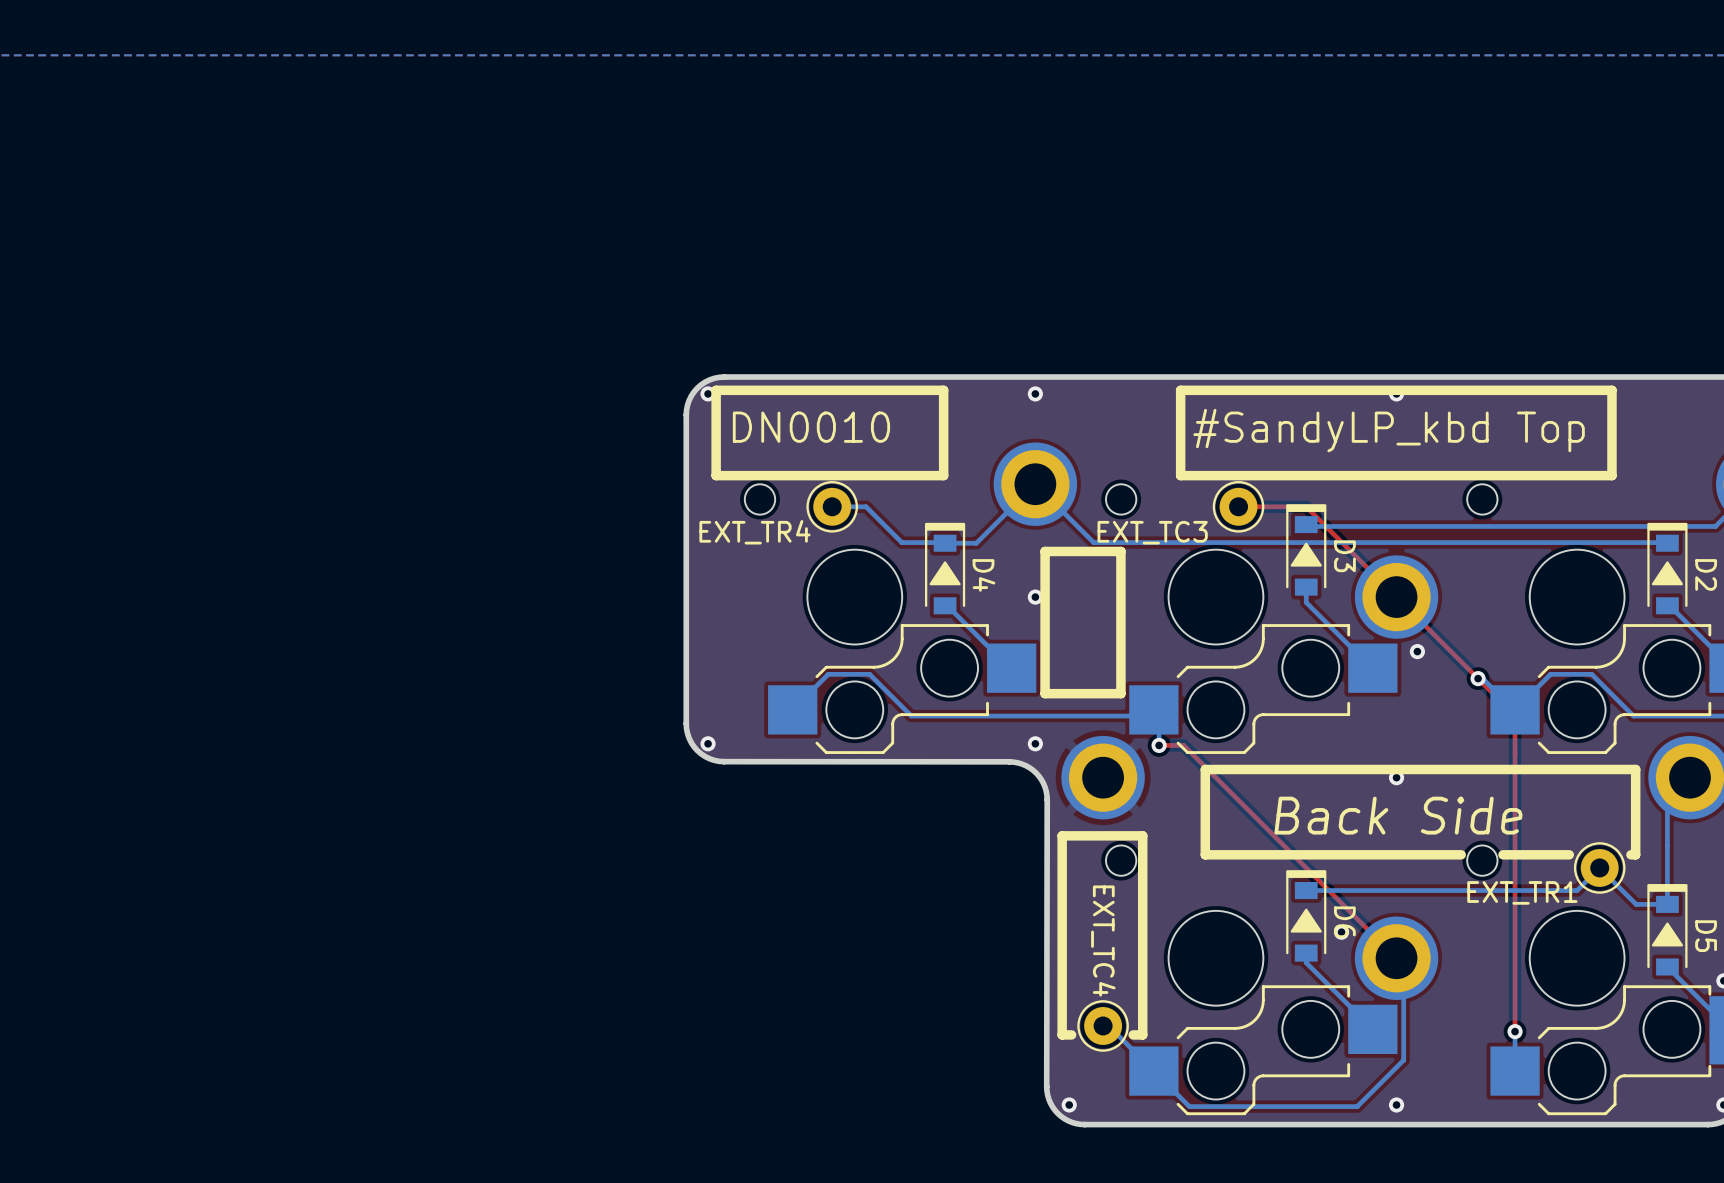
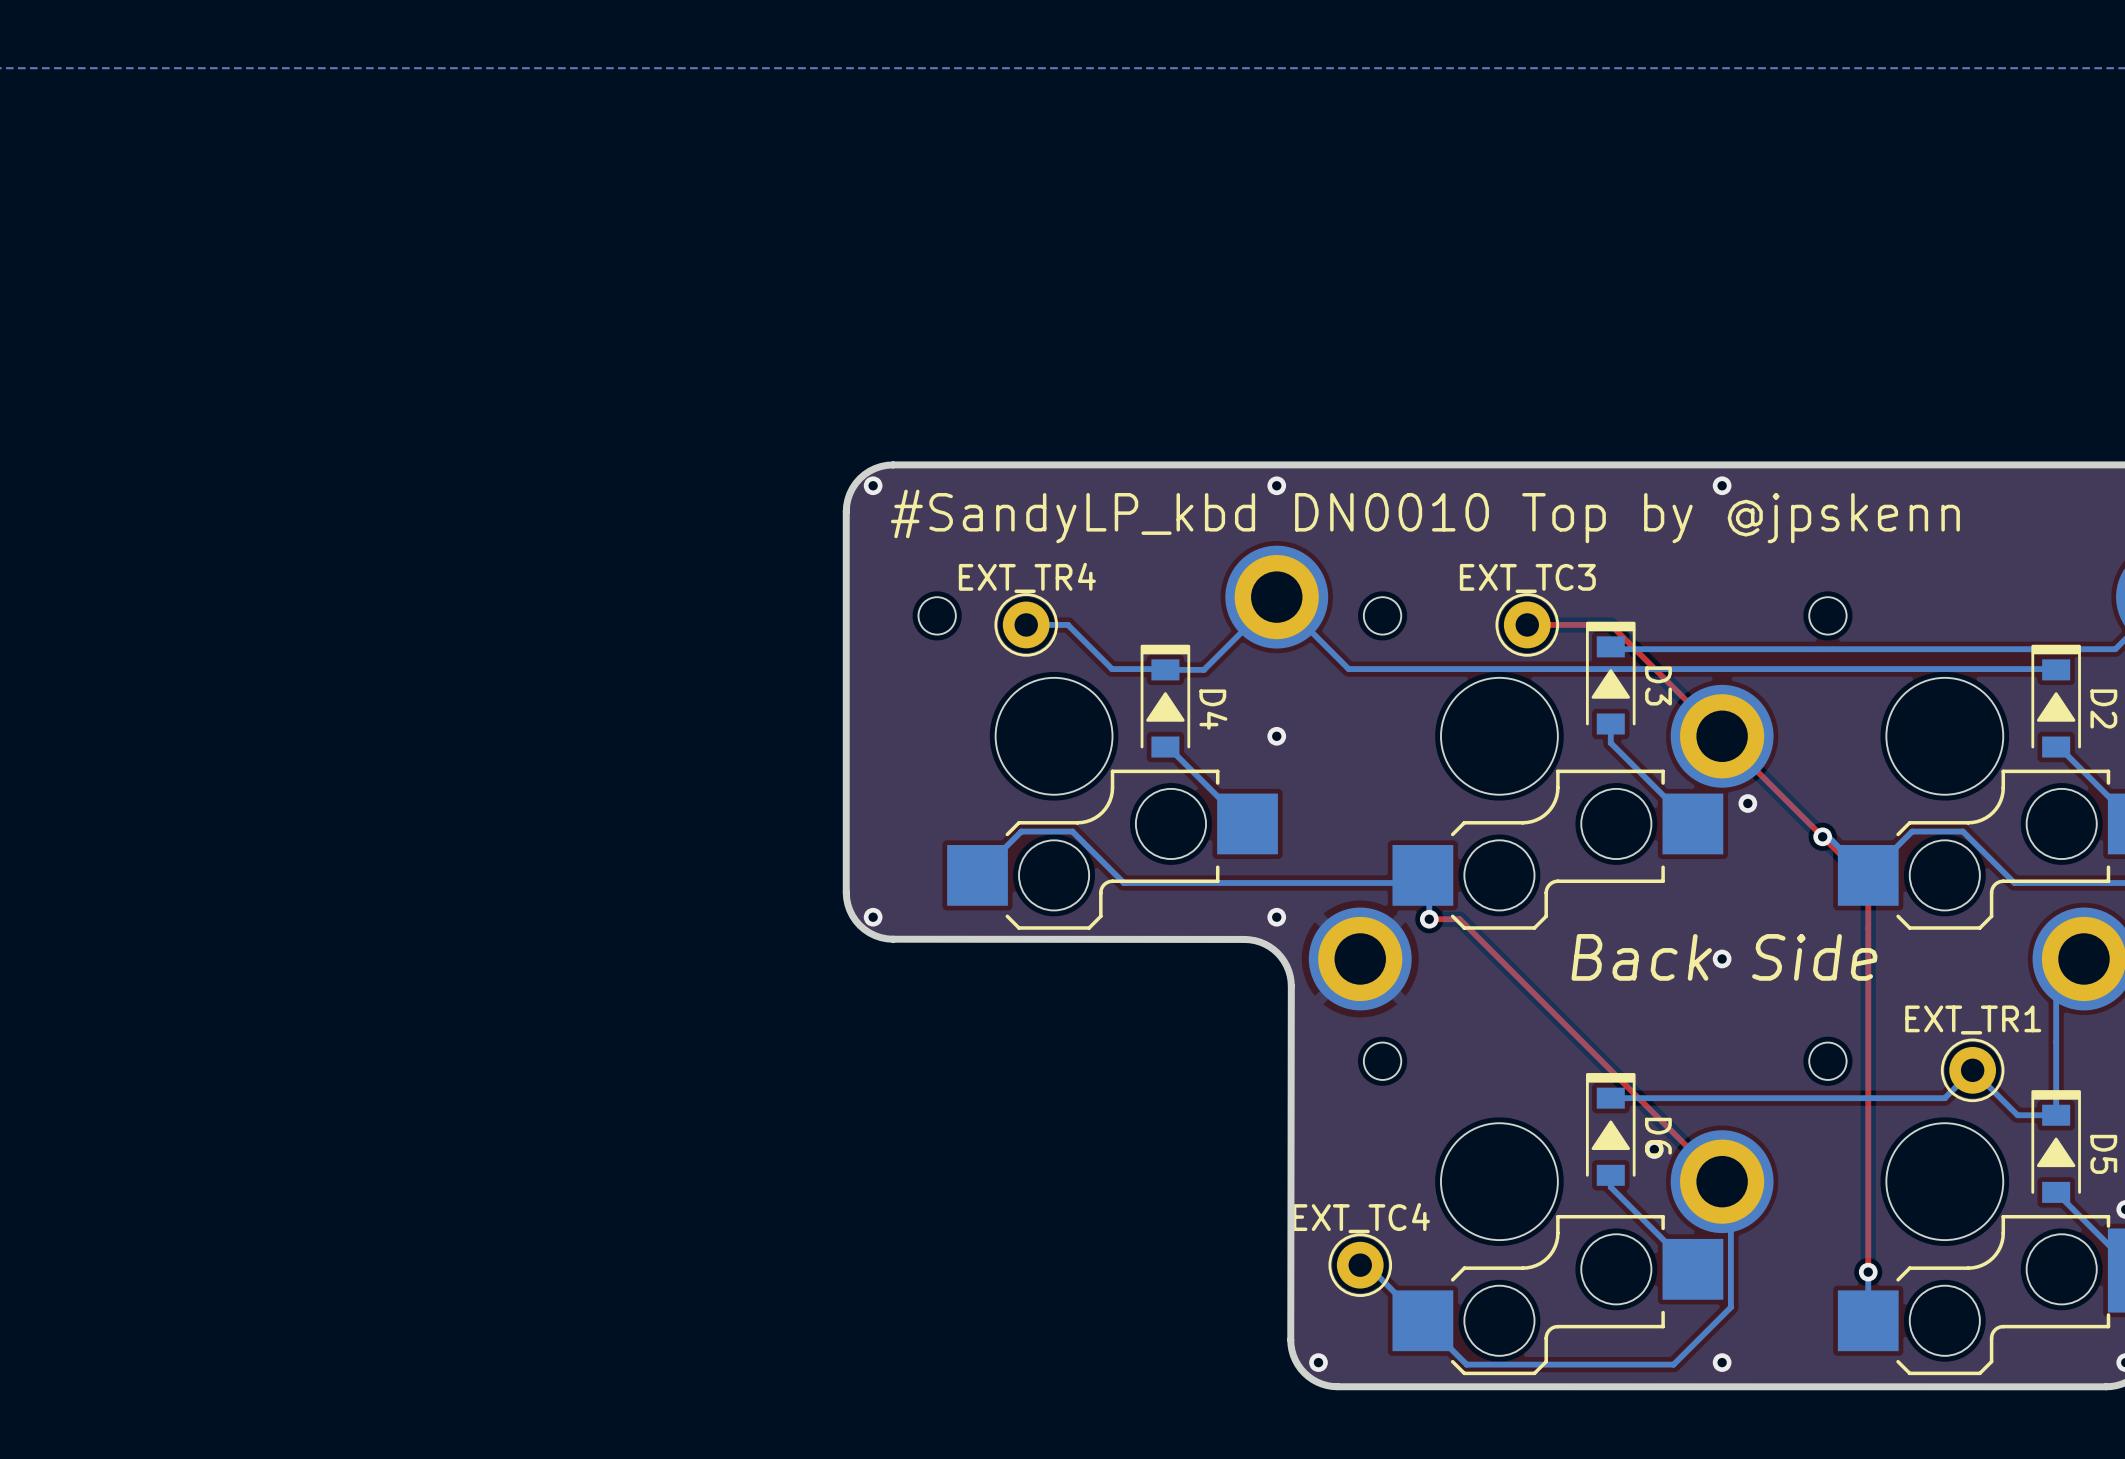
line: (943, 390) (716, 390) (716, 475) (943, 475) (943, 390) -> none
line: (1611, 390) (1180, 390) (1180, 475) (1611, 475) (1611, 390) -> none
text: DN0010 (811, 427) -> #SandyLP_kbd DN0010 Top by @jpskenn (1425, 516)
text: #SandyLP_kbd Top (1389, 430) -> none
EXT_TR4 name position: EXT_TR4 (754, 532) -> EXT_TR4 (1027, 577)
EXT_TC3 name position: EXT_TC3 (1152, 532) -> EXT_TC3 (1527, 578)
line: (1120, 551) (1045, 551) (1045, 693) (1120, 693) (1120, 551) -> none
text position: Back Side (1398, 815) -> Back Side (1724, 957)
line: (1569, 854) (1502, 854) -> none
line: (1630, 854) (1635, 854) (1635, 769) (1205, 769) (1205, 854) (1461, 854) -> none
EXT_TR1 name position: EXT_TR1 (1522, 892) -> EXT_TR1 (1973, 1020)
EXT_TC4 name rotation: 0° (1103, 941) -> 90° counterclockwise (1361, 1218)
line: (1133, 1034) (1142, 1034) (1142, 835) (1062, 835) (1062, 1034) (1071, 1034) -> none

